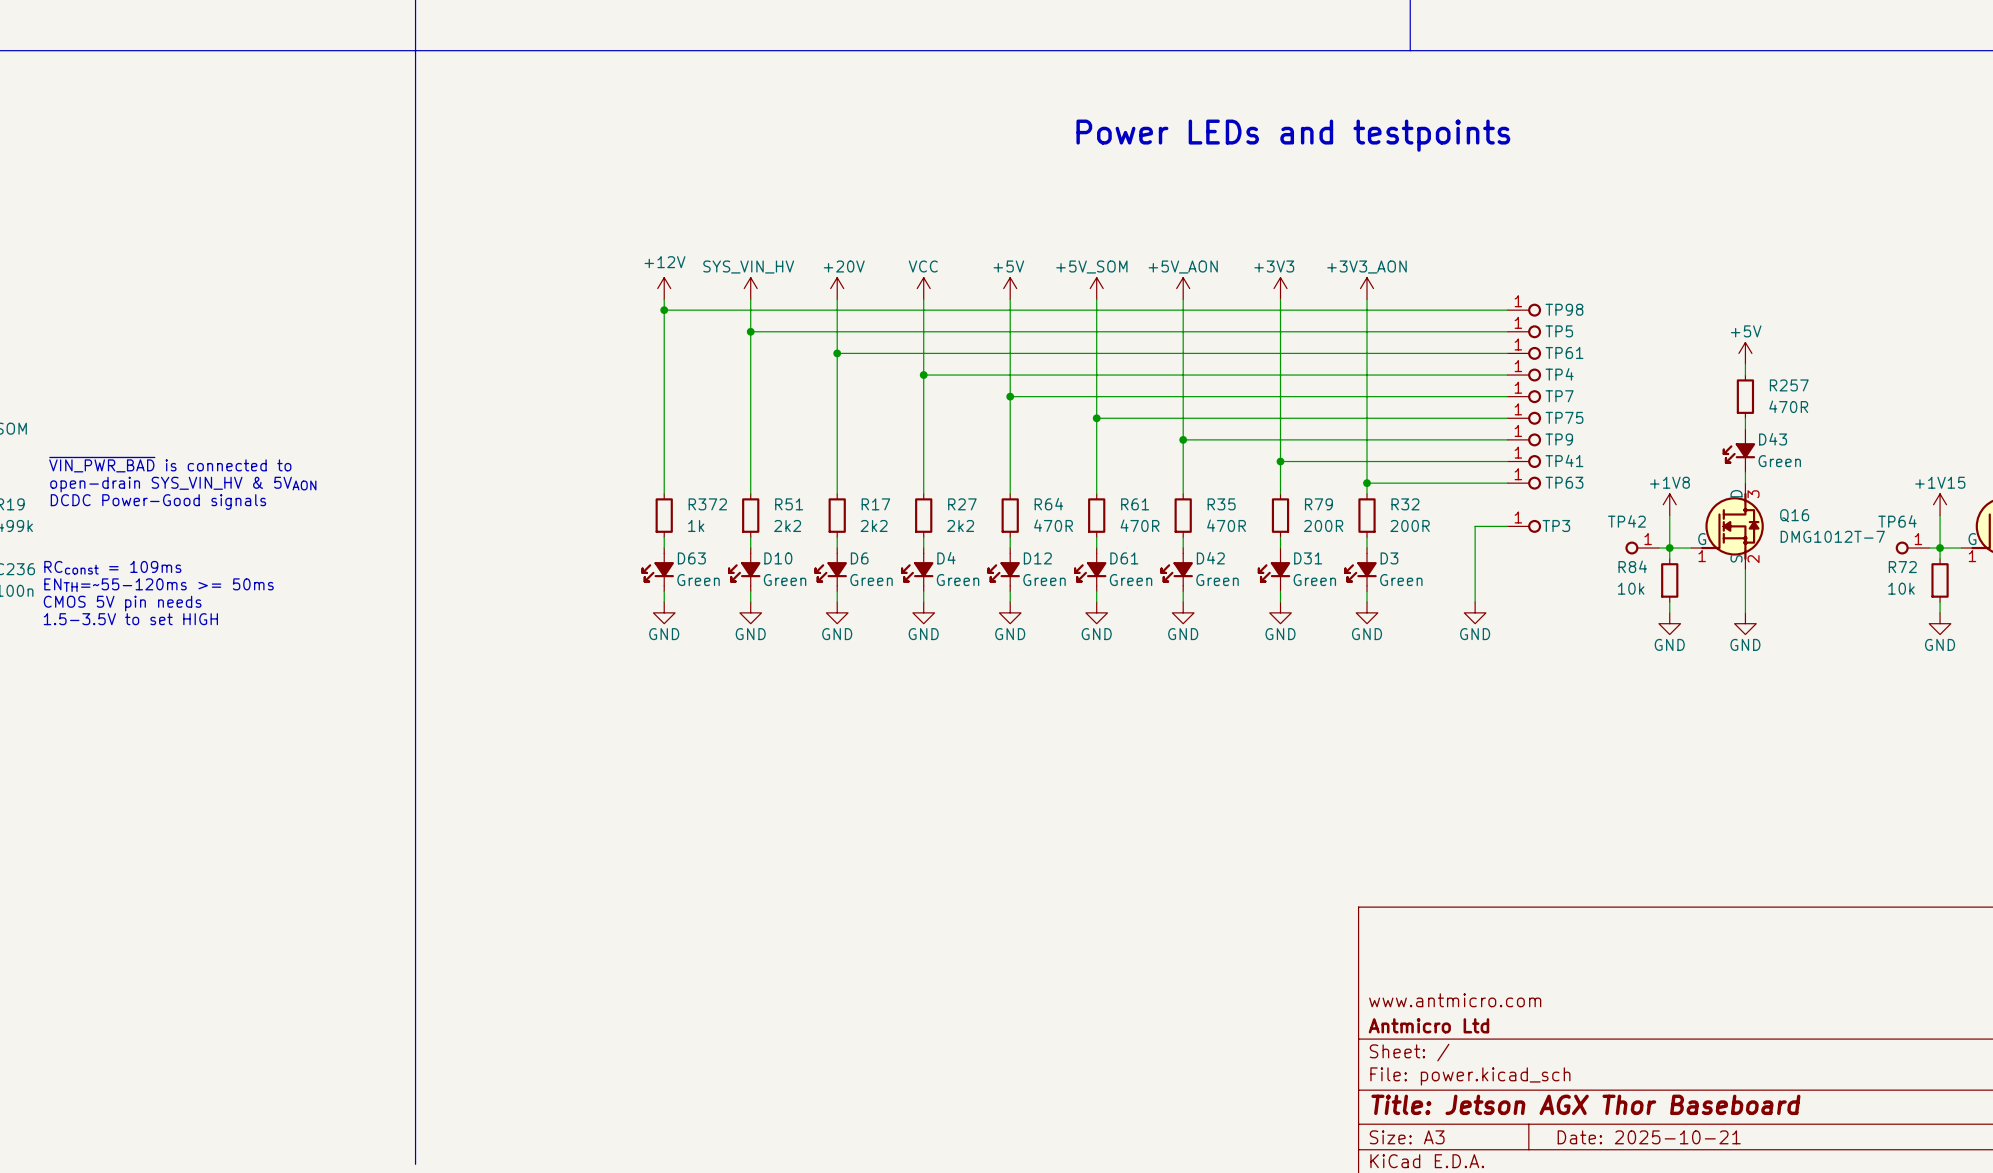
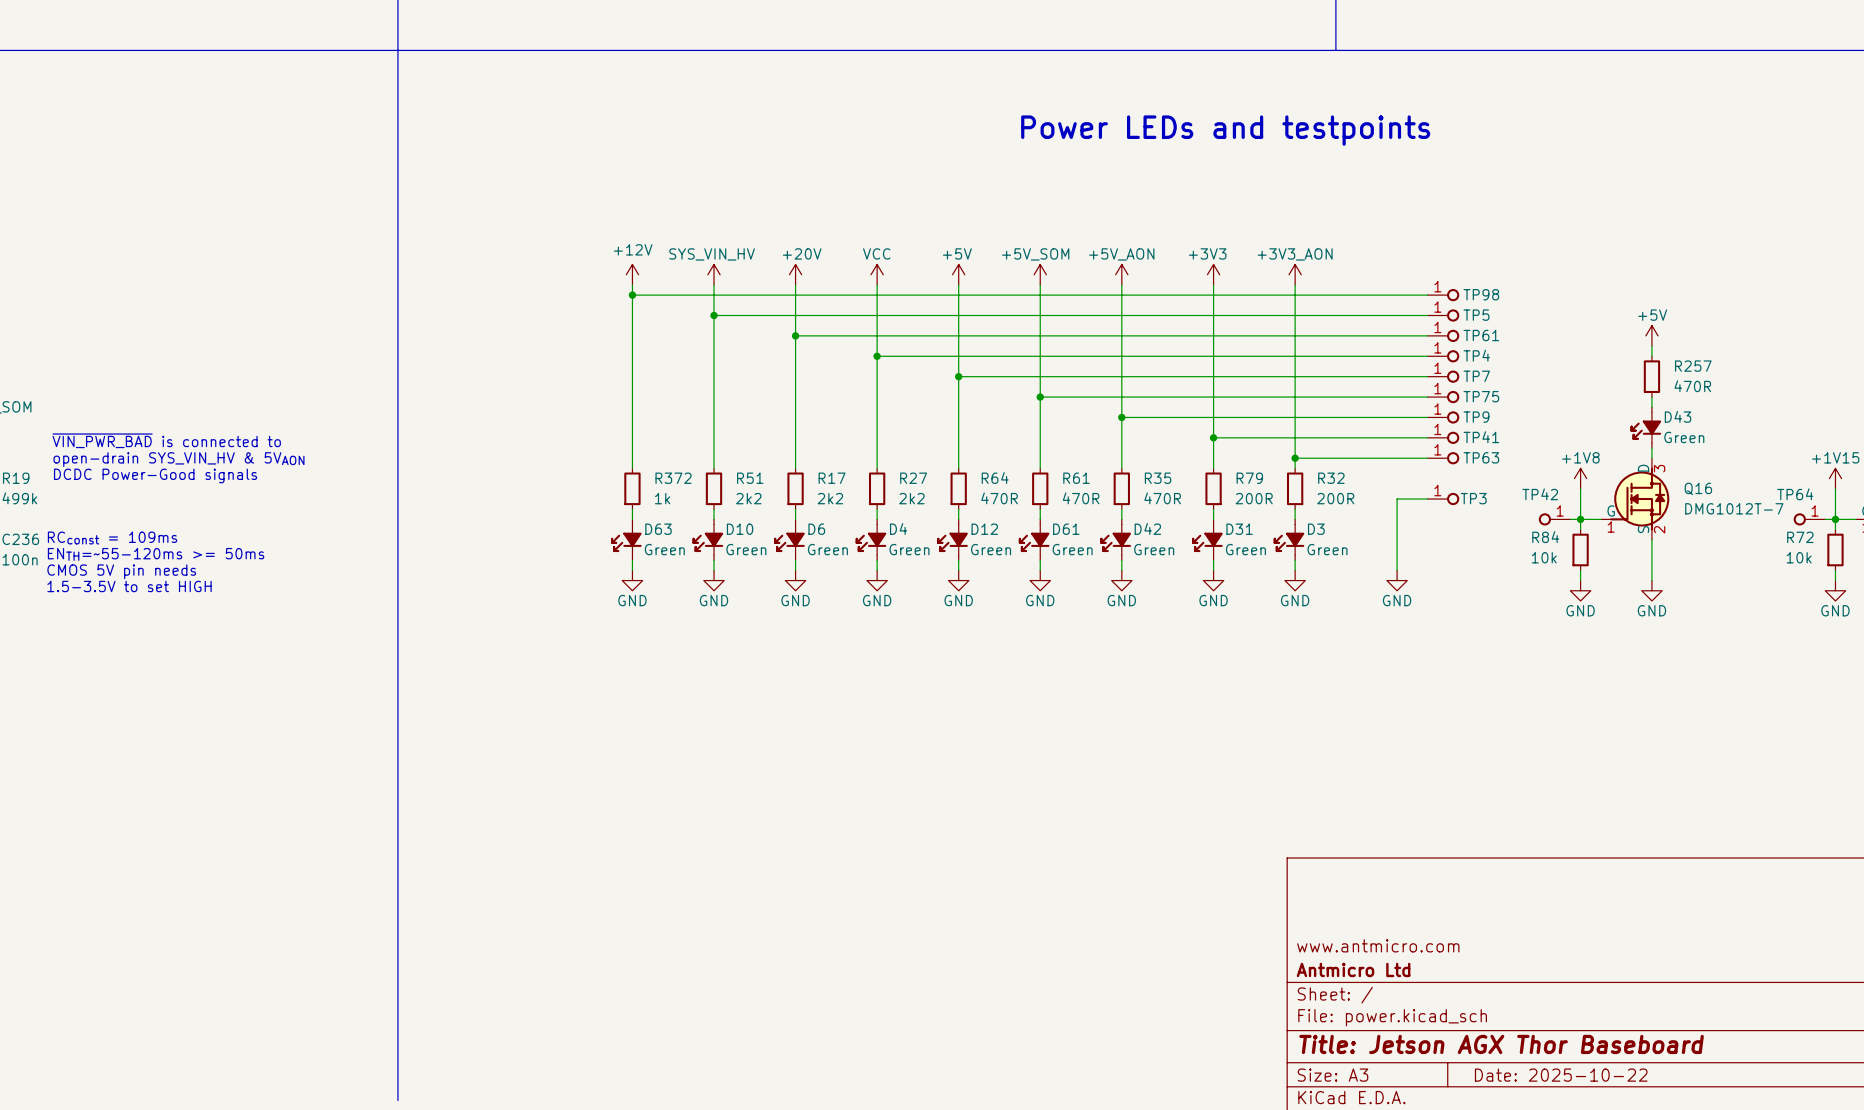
title block: Date: 2025-10-21 (1649, 1137) -> Date: 2025-10-22 (1561, 1075)

